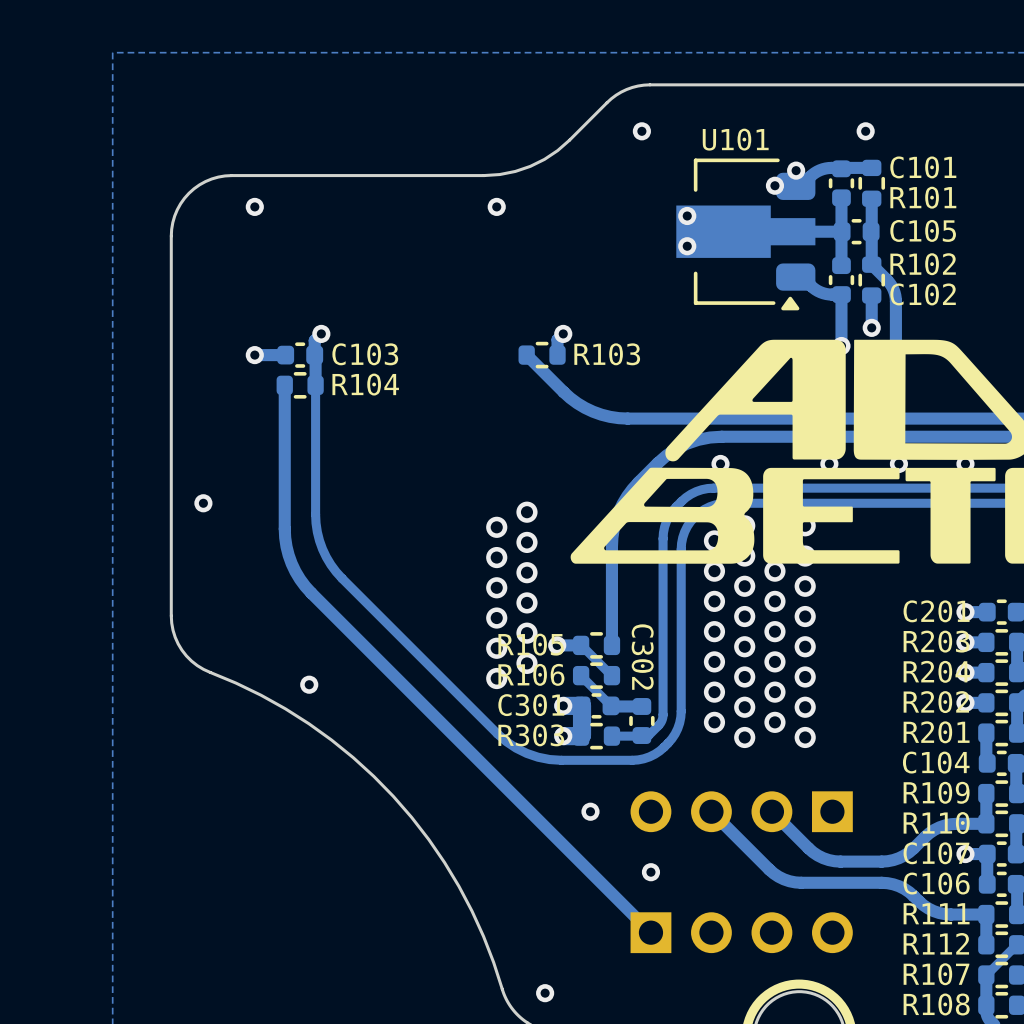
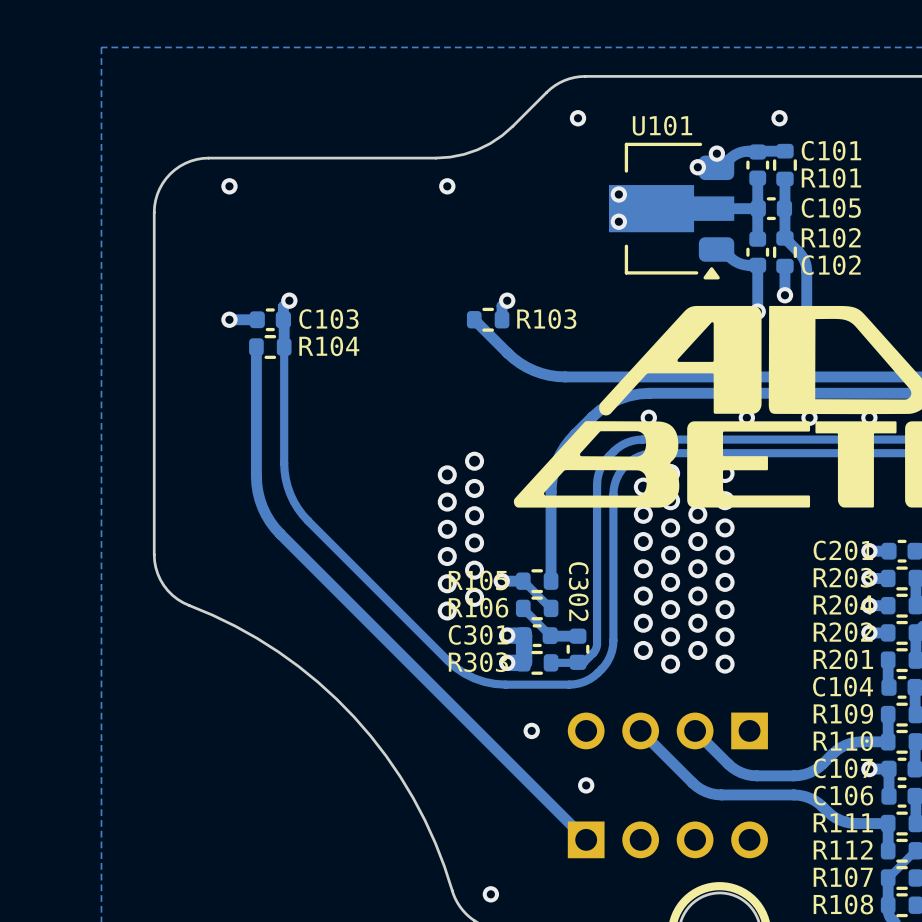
via: (203, 503) -> none
via: (309, 684) -> none

